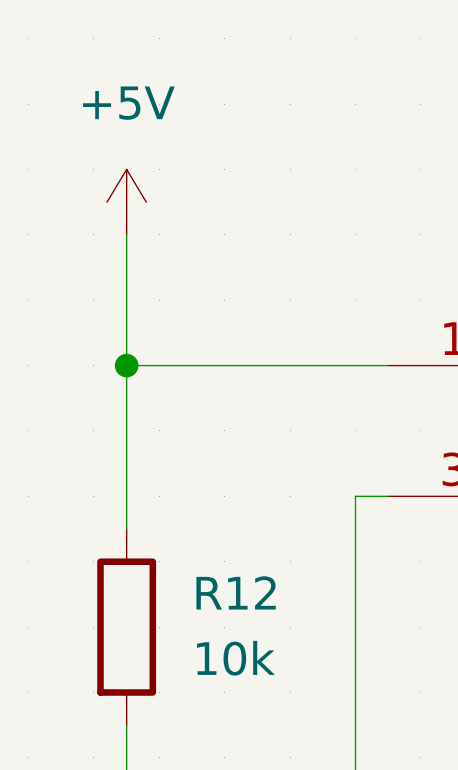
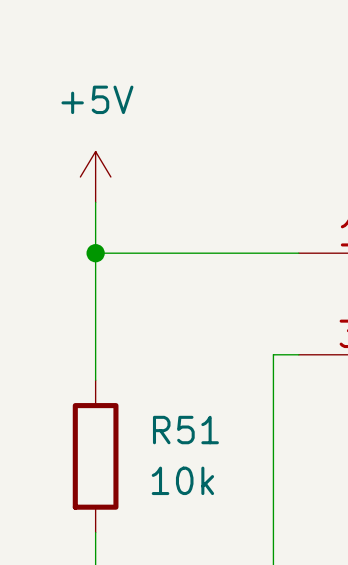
power symbol position: +5V (126, 202) -> +5V (95, 176)
R12 name: R12 (236, 592) -> R51 (185, 430)

